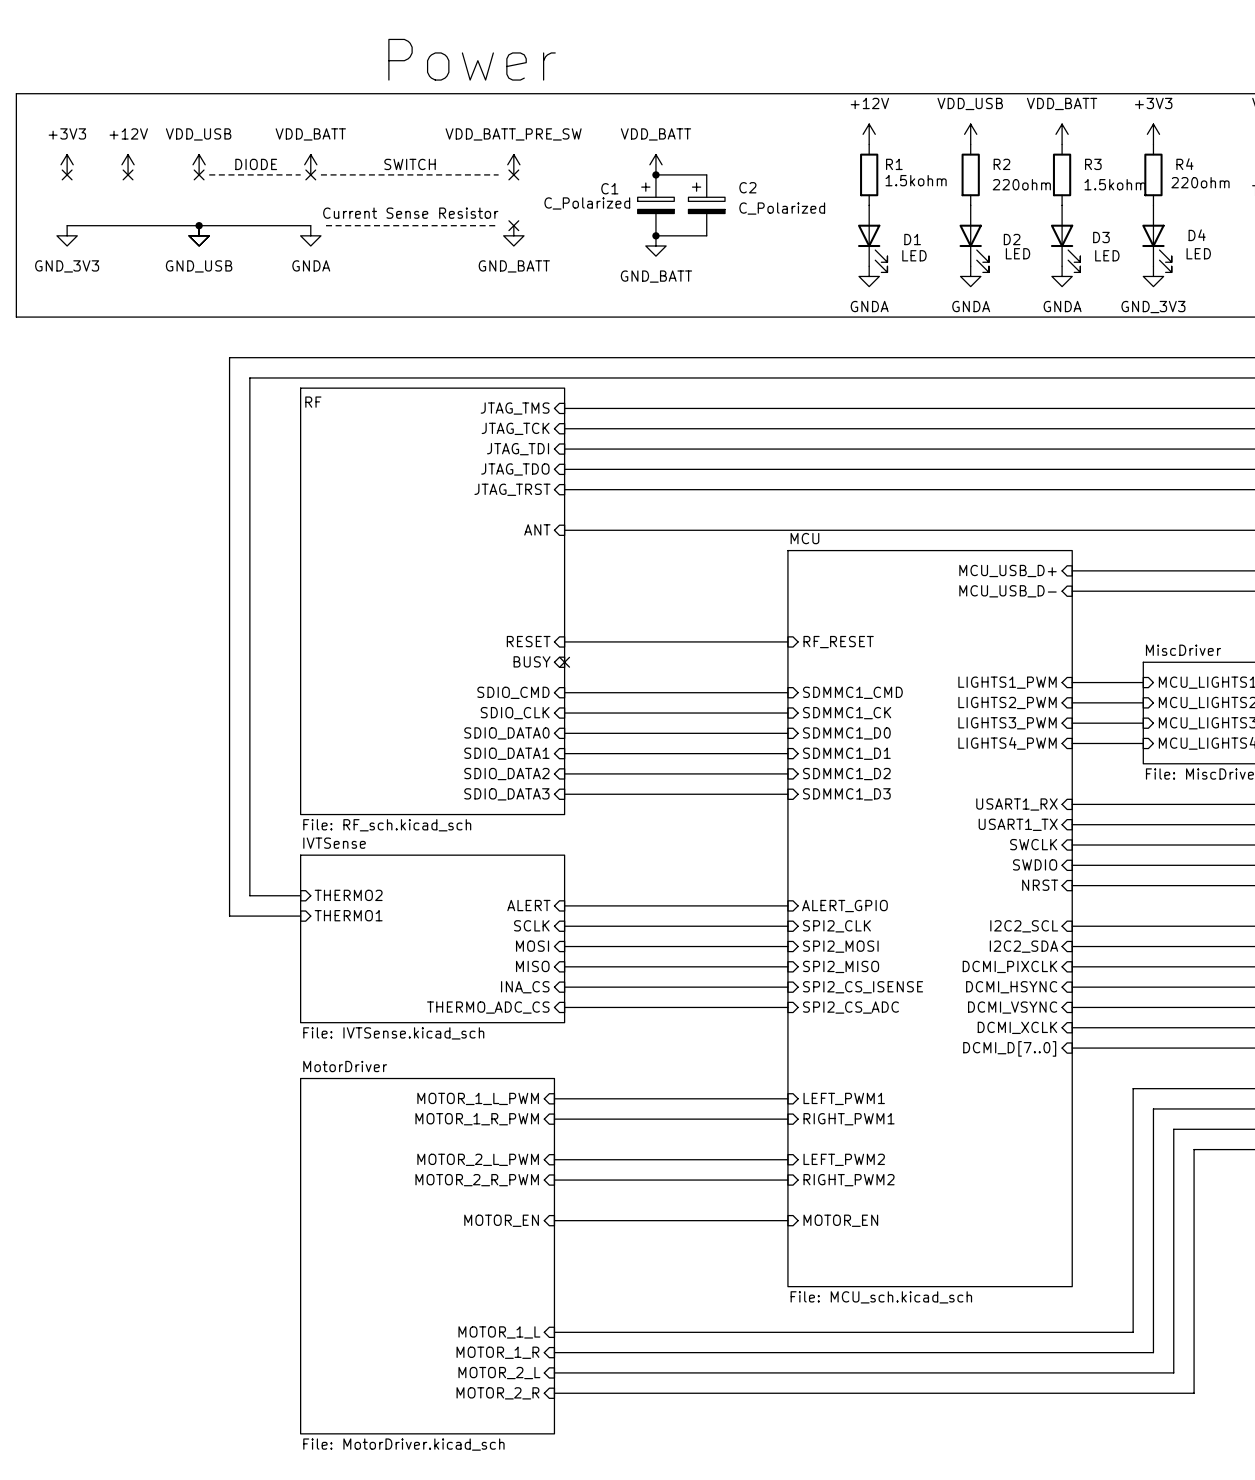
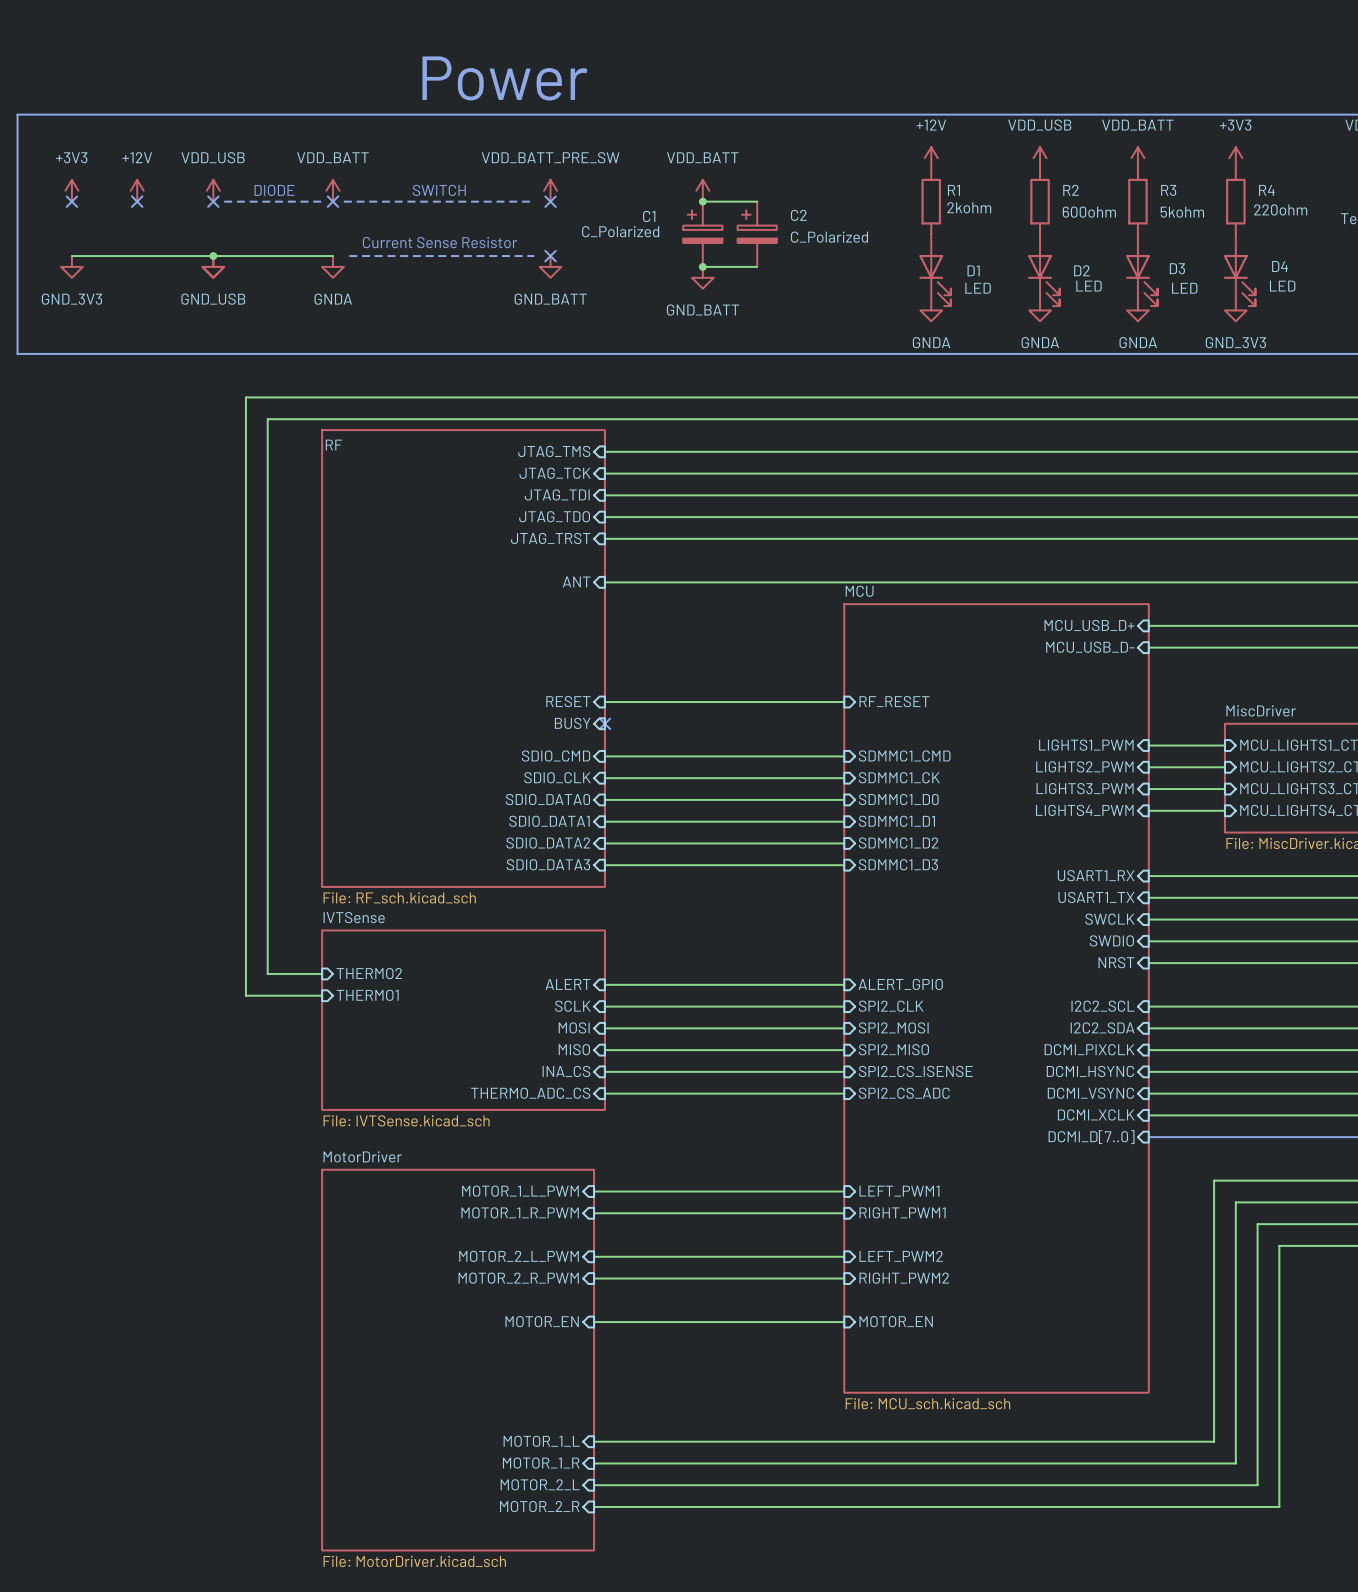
R1 value: 1.5kohm (916, 180) -> 2kohm (969, 207)
R2 value: 220ohm (1021, 184) -> 600ohm (1089, 212)
R3 value: 1.5kohm (1115, 184) -> 5kohm (1182, 212)

